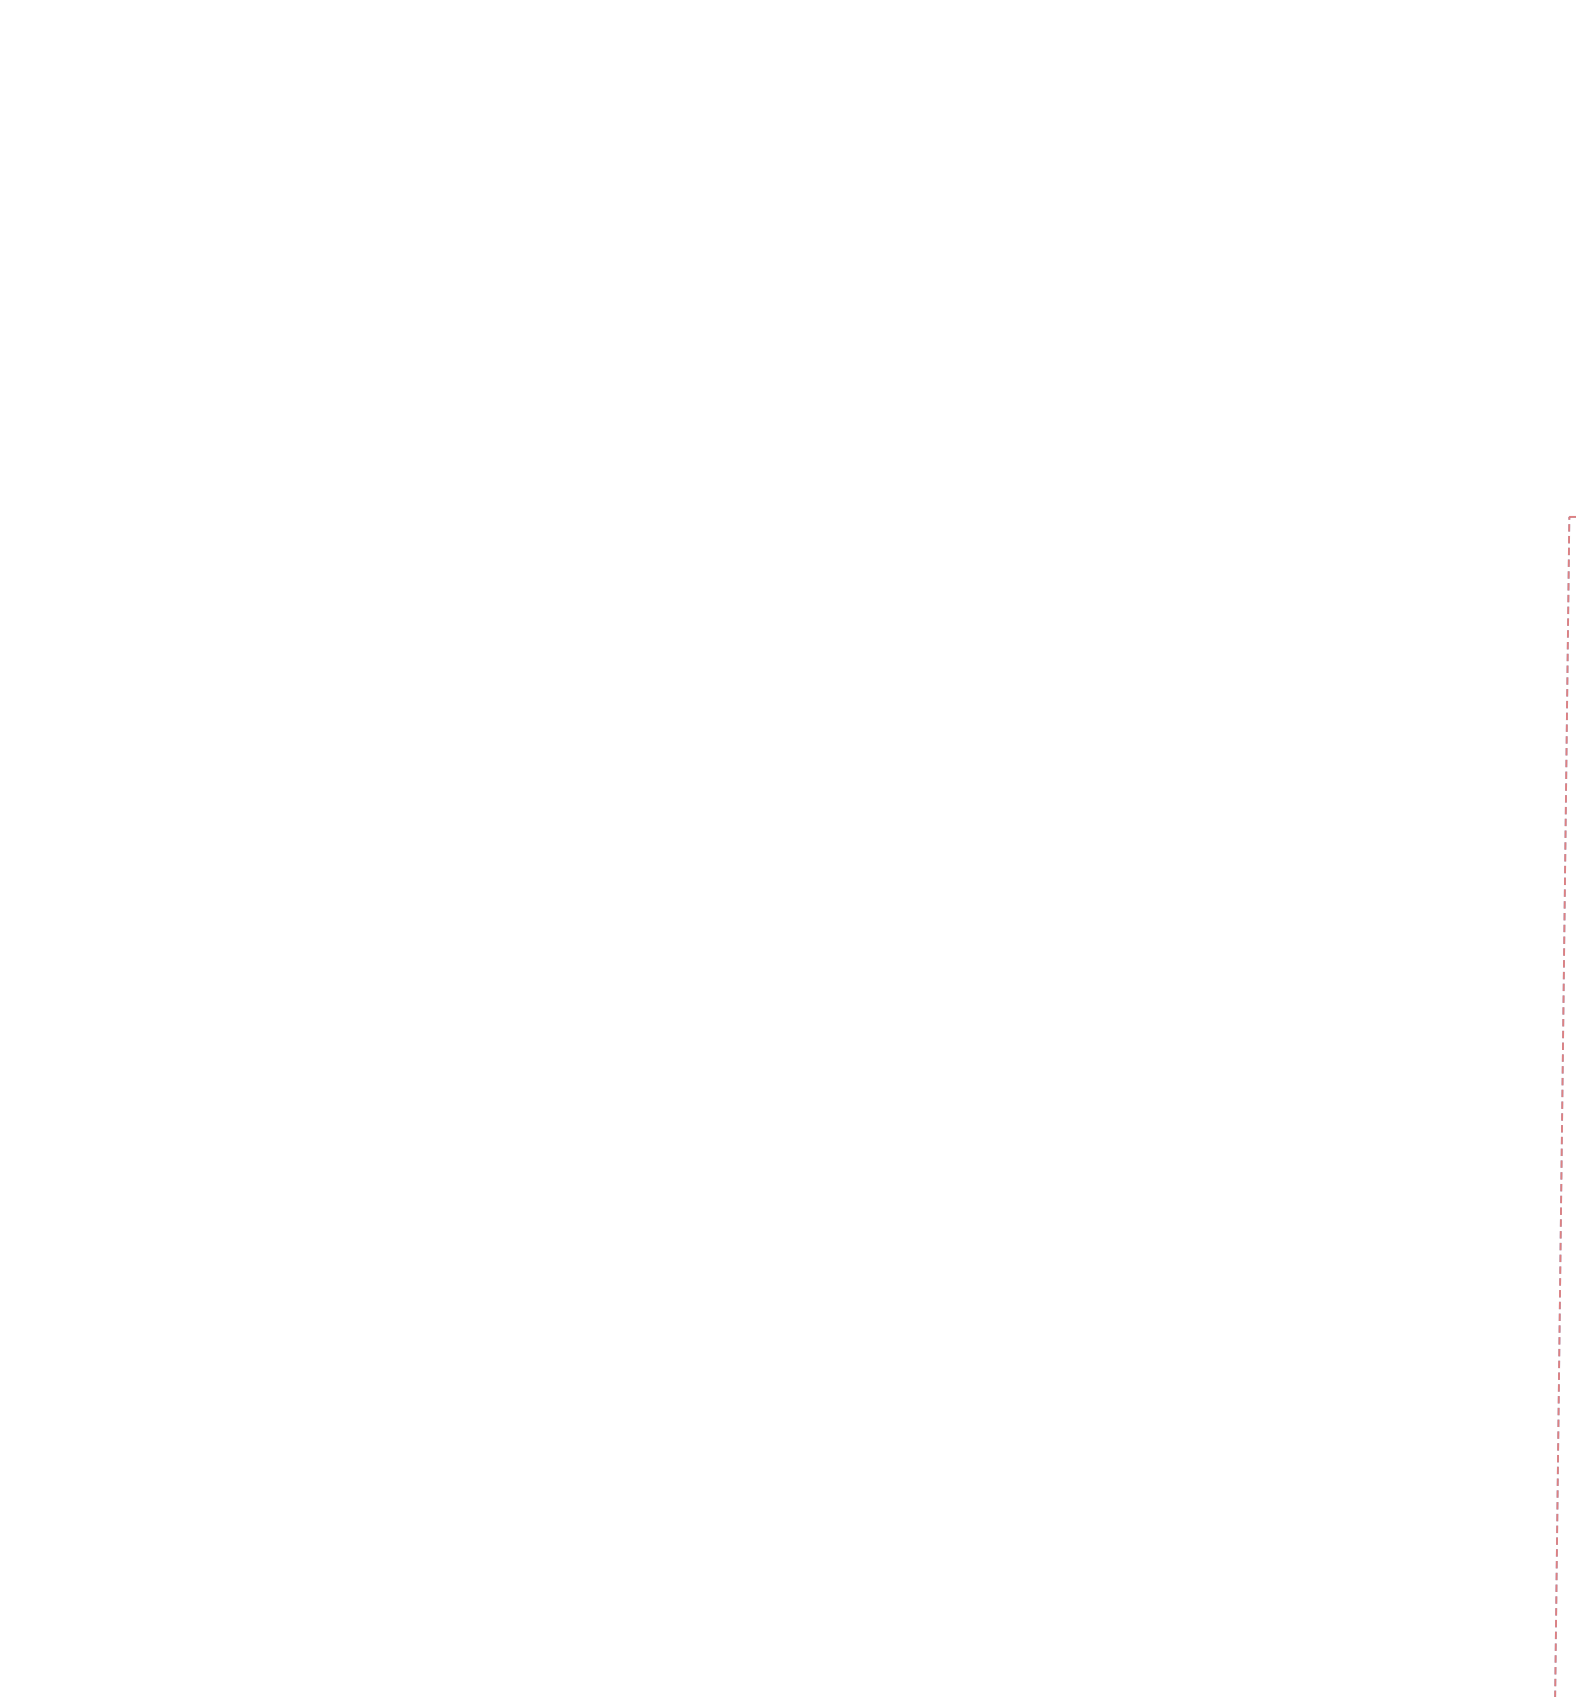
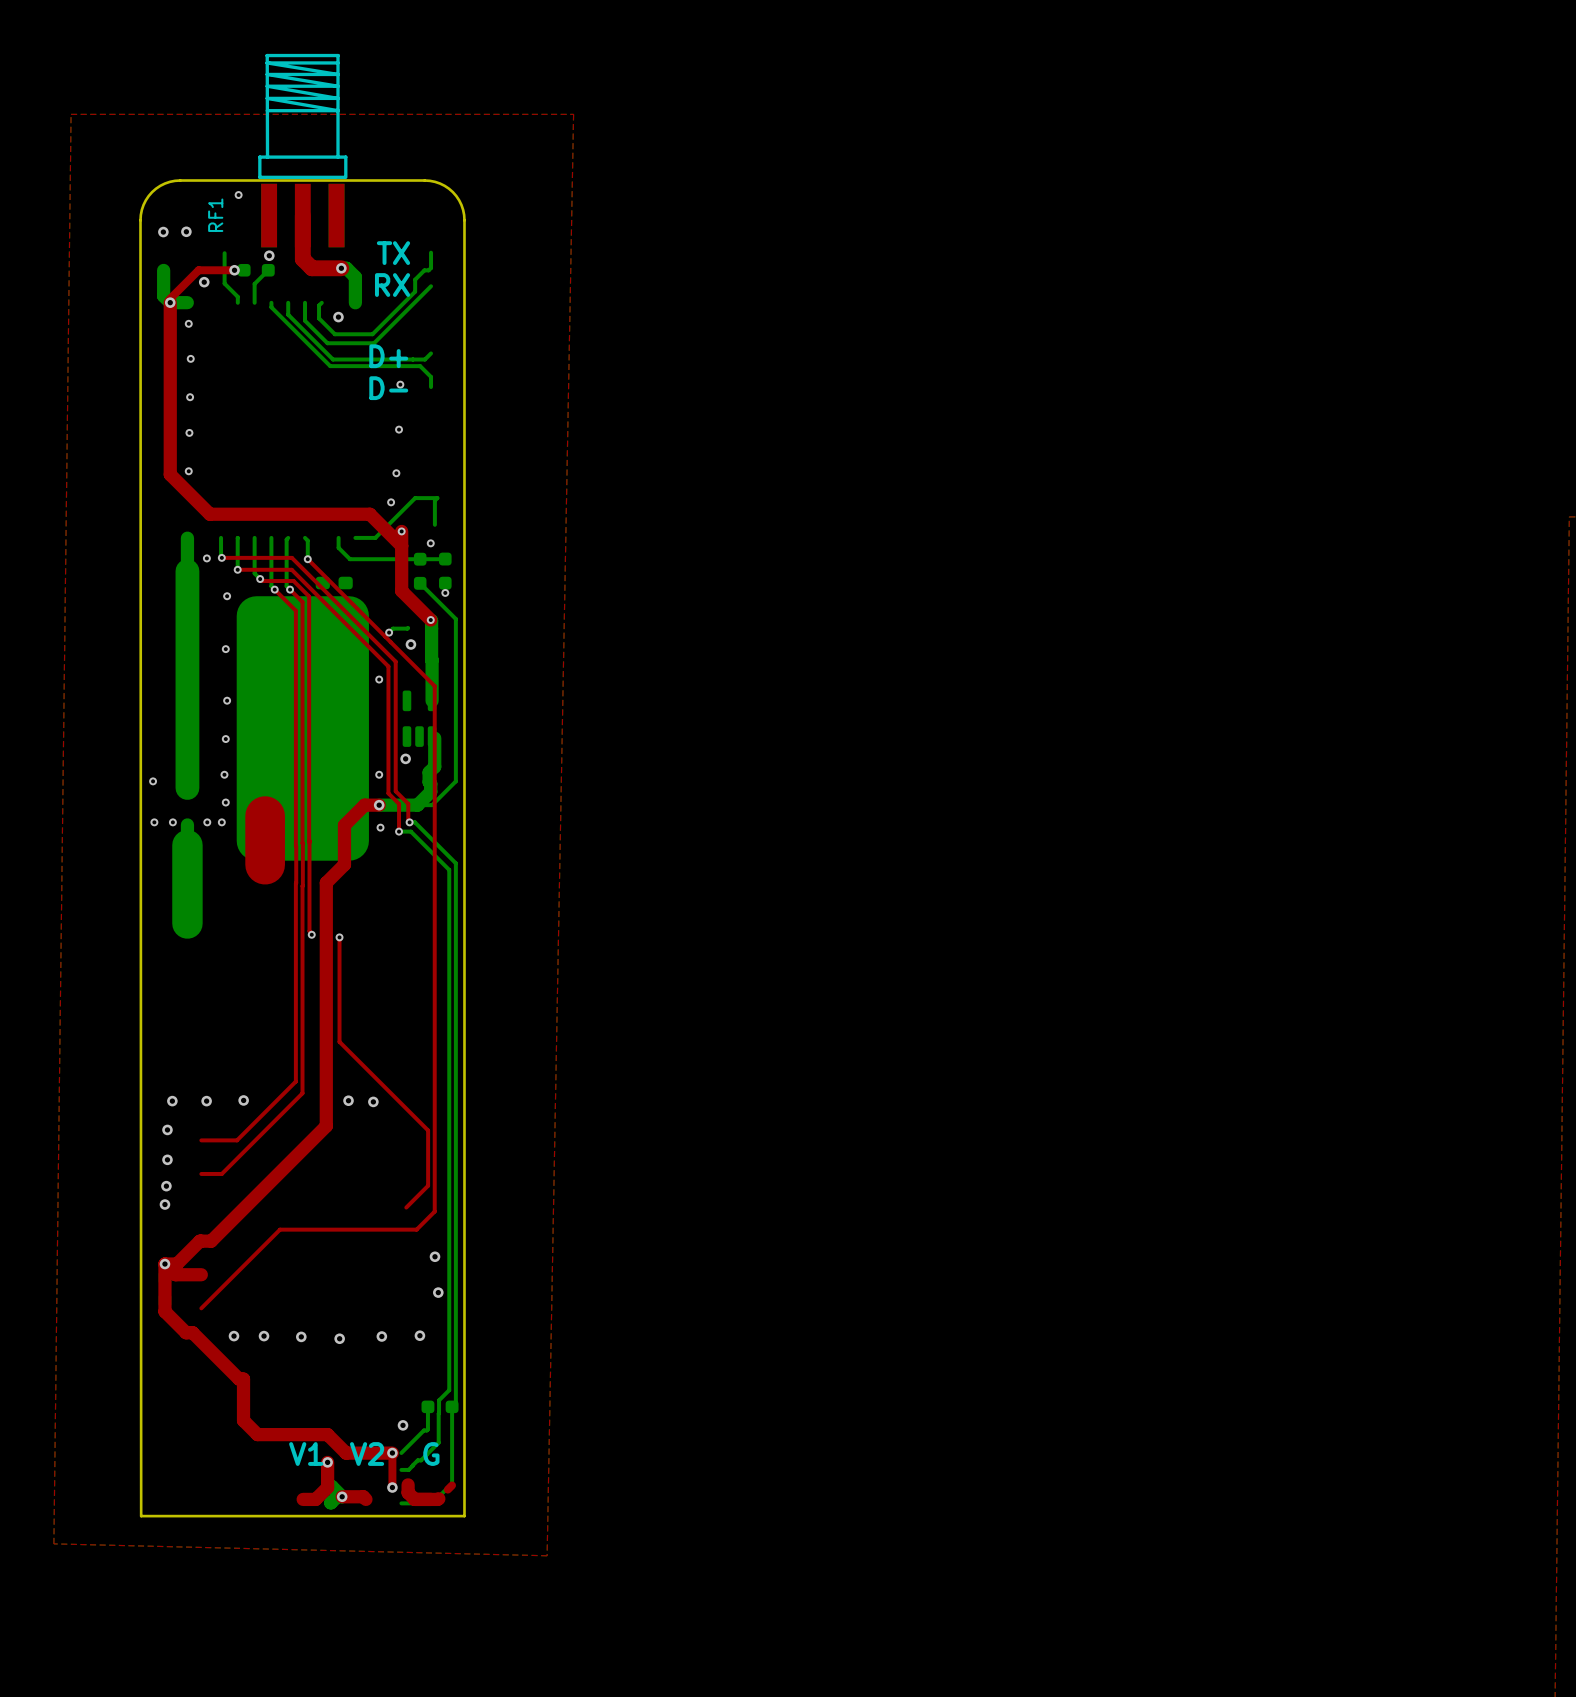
top zone outline: none -> (71, 114) (573, 114) (547, 1555) (53, 1543) (71, 114)
RF1: none -> (302, 150)
board edge: none -> (180, 180) (429, 180) (448, 188) (459, 200) (463, 209) (464, 1516) (141, 1516) (140, 220) (143, 204) (152, 192) (164, 183) (180, 180)
via: none -> (238, 195)
top track: none -> (302, 215) (302, 259) (312, 268) (341, 268)
via: none -> (186, 231)
via: none -> (163, 232)
bottom track: none -> (431, 252) (431, 268) (424, 270) (415, 279) (415, 291) (372, 334) (334, 334) (319, 318) (319, 305) (321, 302)
bottom track: none -> (224, 253) (224, 283) (237, 296) (237, 302)
text: none -> TX (393, 253)
via: none -> (269, 255)
bottom track: none -> (341, 268) (346, 268) (355, 277) (355, 302)
via: none -> (341, 268)
bottom track: none -> (163, 270) (163, 296) (170, 302) (187, 302)
top track: none -> (234, 270) (198, 270) (170, 298) (170, 474) (209, 514) (369, 514) (401, 545)
via: none -> (234, 270)
part: none -> (256, 270)
bottom track: none -> (268, 270) (254, 283) (254, 302)
via: none -> (204, 282)
text: none -> RX (392, 285)
bottom track: none -> (431, 286) (374, 343) (327, 343) (305, 320) (305, 302)
via: none -> (170, 302)
bottom track: none -> (271, 302) (271, 307) (330, 366) (420, 366) (431, 376) (431, 387)
bottom track: none -> (288, 302) (288, 314) (333, 359) (424, 359) (431, 353)
via: none -> (338, 317)
via: none -> (188, 323)
text: none -> D+ (388, 356)
via: none -> (190, 358)
via: none -> (400, 384)
text: none -> D- (388, 388)
via: none -> (190, 397)
via: none -> (399, 429)
via: none -> (189, 432)
via: none -> (188, 471)
via: none -> (396, 473)
via: none -> (391, 502)
bottom track: none -> (434, 524) (434, 500) (437, 498) (415, 498) (375, 537) (355, 537)
top track: none -> (401, 531) (401, 590) (430, 620)
via: none -> (401, 531)
bottom track: none -> (221, 537) (221, 557)
bottom track: none -> (254, 537) (254, 573) (260, 579)
bottom track: none -> (271, 537) (271, 586) (274, 589)
bottom track: none -> (288, 537) (286, 539) (286, 586) (290, 589)
bottom track: none -> (305, 537) (307, 540) (307, 559)
bottom track: none -> (338, 537) (338, 547) (349, 559) (445, 559)
bottom track: none -> (187, 538) (187, 570)
bottom track: none -> (237, 538) (237, 569)
via: none -> (430, 543)
top track: none -> (221, 557) (291, 557) (395, 661) (395, 791) (408, 803) (409, 822)
via: none -> (221, 557)
via: none -> (206, 558)
top track: none -> (307, 559) (434, 686) (434, 1211) (416, 1229) (280, 1229) (201, 1308)
via: none -> (307, 559)
top track: none -> (237, 569) (291, 569) (388, 666) (388, 793) (399, 803) (399, 831)
via: none -> (237, 569)
bottom track: none -> (187, 570) (187, 787)
part: none -> (420, 571)
part: none -> (445, 571)
top track: none -> (260, 579) (262, 581) (293, 581) (309, 596) (309, 931) (311, 934)
via: none -> (260, 579)
part: none -> (334, 583)
bottom track: none -> (420, 583) (455, 619) (455, 781) (432, 805) (379, 805) (417, 805) (430, 791) (429, 772) (434, 766) (434, 738)
top track: none -> (274, 589) (295, 610) (295, 1081) (237, 1140) (201, 1140)
via: none -> (274, 589)
top track: none -> (290, 589) (302, 602) (302, 1093) (221, 1173) (201, 1173)
via: none -> (290, 589)
via: none -> (445, 592)
via: none -> (227, 596)
bottom track: none -> (430, 620) (432, 700)
via: none -> (430, 620)
bottom track: none -> (408, 627) (393, 628) (389, 632)
via: none -> (389, 632)
via: none -> (410, 644)
via: none -> (225, 649)
via: none -> (379, 679)
via: none -> (227, 700)
part: none -> (419, 718)
part: none -> (302, 728)
via: none -> (225, 739)
via: none -> (405, 758)
via: none -> (224, 774)
via: none -> (379, 774)
via: none -> (153, 781)
via: none -> (225, 802)
top track: none -> (379, 805) (364, 805) (344, 825) (344, 864) (326, 882) (326, 1126) (211, 1241) (199, 1241) (177, 1264) (164, 1264)
via: none -> (379, 805)
top track: none -> (265, 815) (265, 864)
via: none -> (154, 822)
via: none -> (172, 822)
via: none -> (207, 822)
via: none -> (221, 822)
bottom track: none -> (409, 822) (414, 822) (455, 863) (455, 1403) (452, 1406) (452, 1483) (432, 1503) (401, 1503)
via: none -> (409, 822)
bottom track: none -> (187, 824) (187, 923)
via: none -> (380, 827)
bottom track: none -> (399, 831) (410, 831) (449, 869) (449, 1390) (439, 1400) (438, 1442) (408, 1469) (401, 1469)
via: none -> (399, 831)
via: none -> (311, 934)
top track: none -> (339, 937) (339, 1041) (428, 1130) (428, 1185) (406, 1207)
via: none -> (339, 937)
via: none -> (243, 1100)
via: none -> (348, 1100)
via: none -> (172, 1101)
via: none -> (206, 1101)
via: none -> (373, 1101)
via: none -> (167, 1129)
via: none -> (167, 1159)
via: none -> (166, 1186)
via: none -> (164, 1204)
via: none -> (435, 1256)
top track: none -> (164, 1264) (175, 1274) (201, 1274)
top track: none -> (164, 1264) (164, 1311) (186, 1332) (192, 1332) (239, 1379) (243, 1379) (243, 1420) (257, 1434) (327, 1434) (346, 1453) (392, 1453)
via: none -> (164, 1264)
via: none -> (438, 1292)
via: none -> (419, 1335)
via: none -> (233, 1336)
via: none -> (264, 1336)
via: none -> (301, 1336)
via: none -> (381, 1336)
via: none -> (339, 1338)
bottom track: none -> (427, 1406) (427, 1429) (423, 1430) (401, 1453)
part: none -> (440, 1406)
via: none -> (402, 1425)
top track: none -> (392, 1453) (392, 1487)
via: none -> (392, 1453)
text: none -> V1 (306, 1454)
text: none -> V2 (367, 1454)
text: none -> G (431, 1454)
top track: none -> (327, 1462) (327, 1487) (315, 1499) (303, 1499)
via: none -> (327, 1462)
top track: none -> (408, 1484) (408, 1492) (414, 1499) (438, 1498)
top track: none -> (452, 1485) (447, 1489)
bottom track: none -> (330, 1486) (342, 1496) (337, 1496) (330, 1502)
via: none -> (392, 1487)
top track: none -> (342, 1496) (363, 1496) (365, 1499)
via: none -> (342, 1496)

